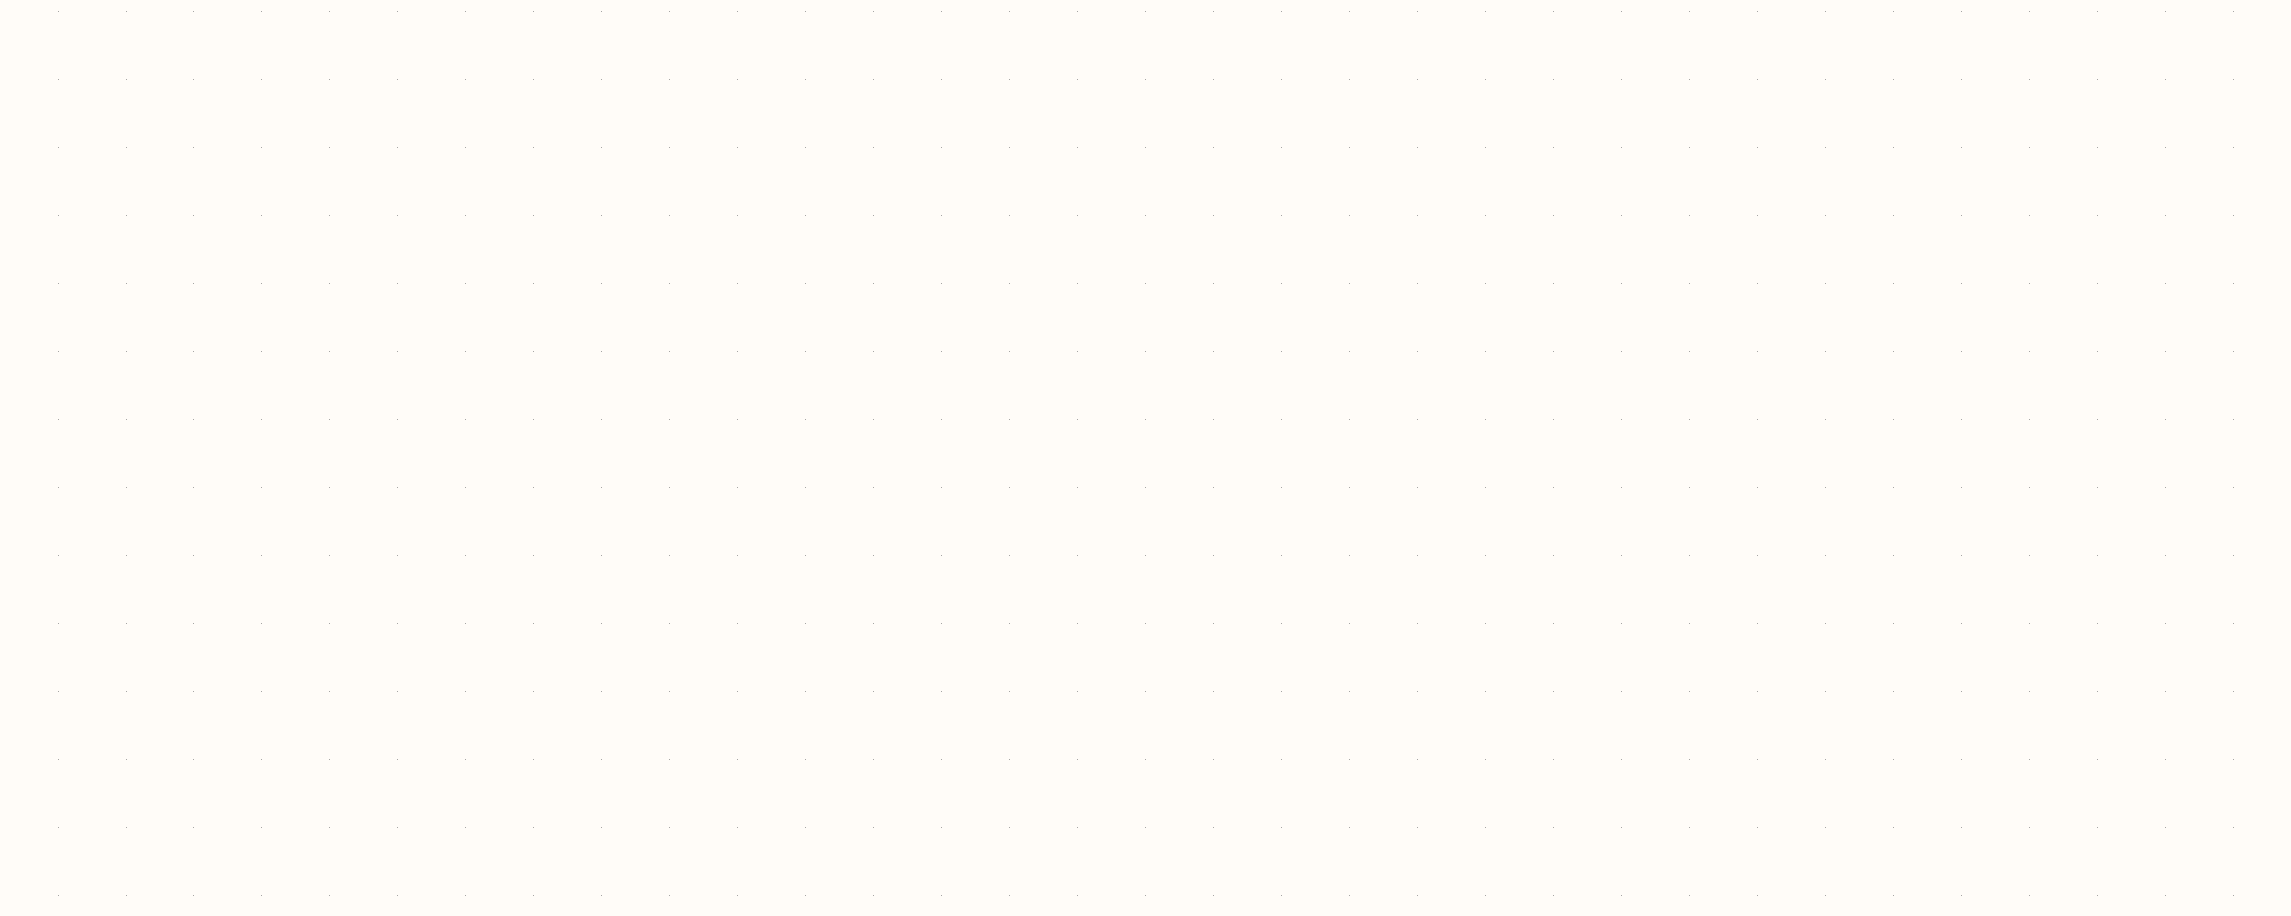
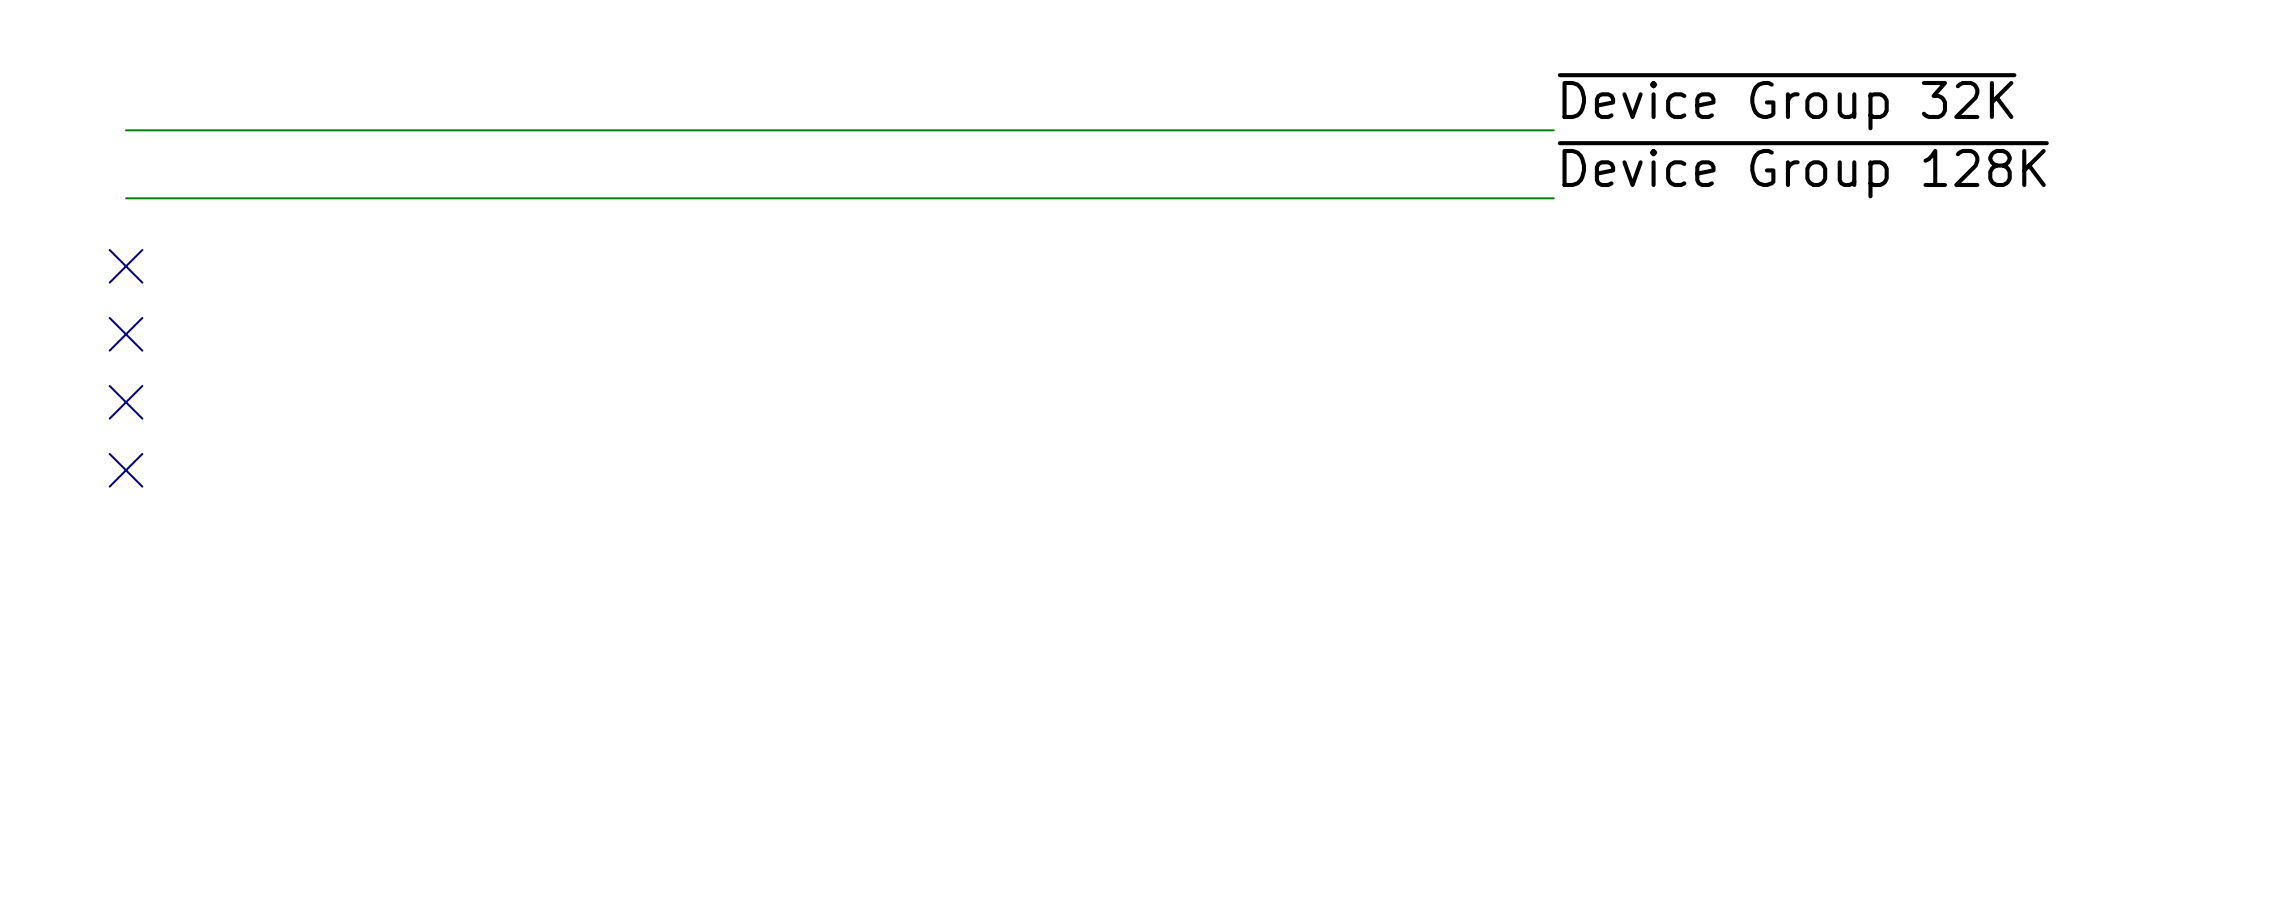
label: none -> ~{Device Group 32K} (1787, 101)
wire: none -> (126, 130) (1553, 130)
label: none -> ~{Device Group 128K} (1803, 169)
wire: none -> (126, 198) (1553, 198)
no-connect mark: none -> (126, 266)
no-connect mark: none -> (126, 334)
no-connect mark: none -> (126, 402)
no-connect mark: none -> (126, 470)

